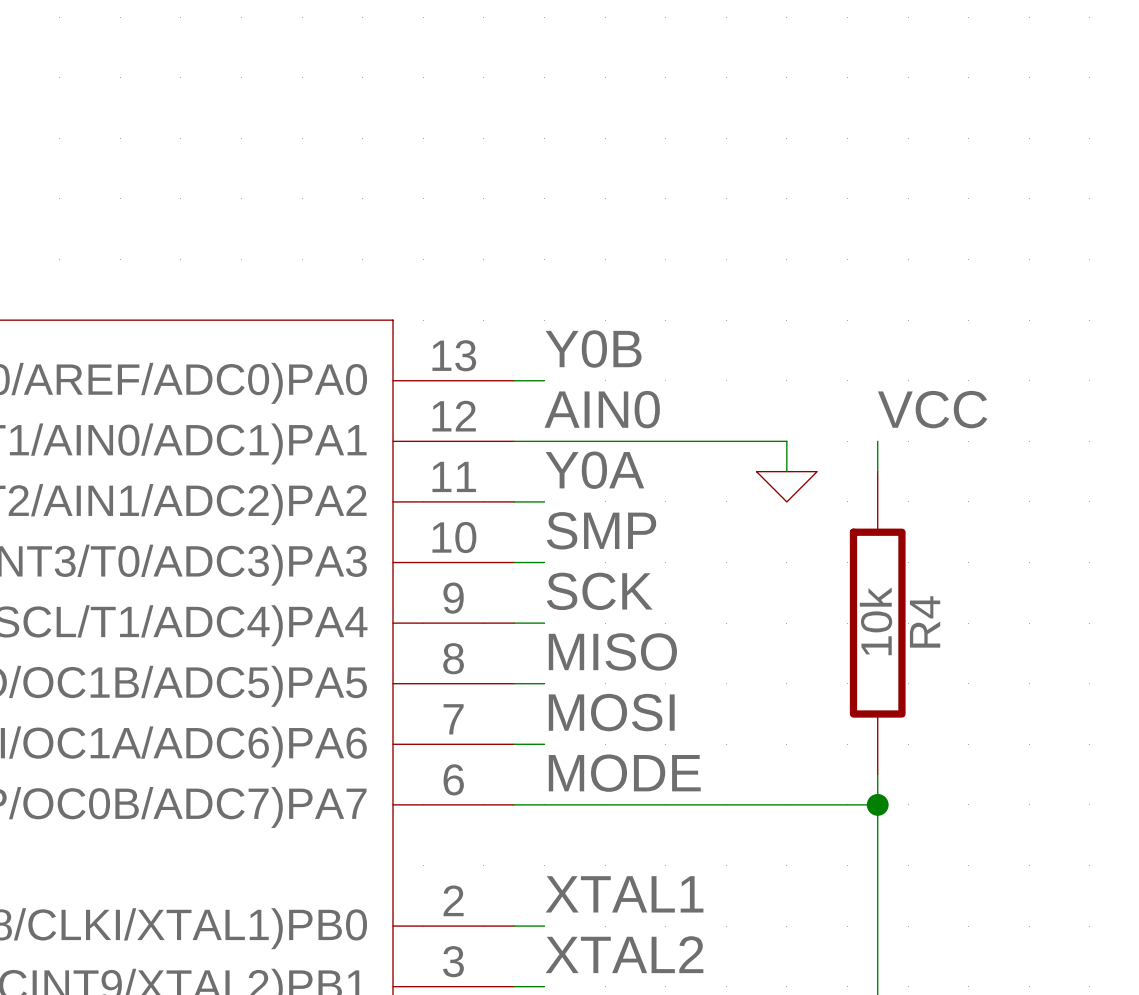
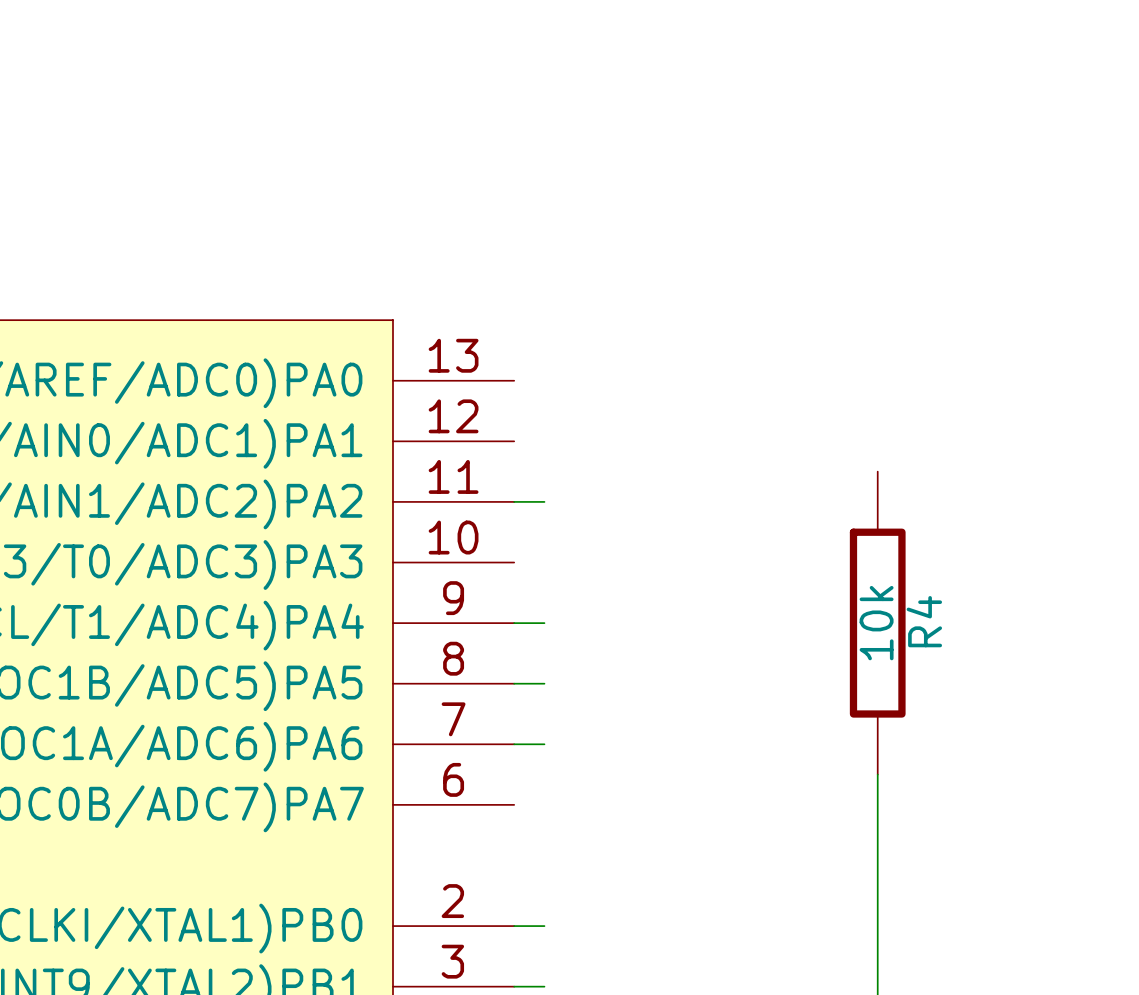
label: Y0B (593, 349) -> none
wire: (514, 380) (544, 380) -> none
label: AIN0 (602, 409) -> none
label: VCC (932, 409) -> none
wire: (514, 441) (786, 441) (786, 471) -> none
wire: (877, 441) (877, 471) -> none
label: Y0A (594, 470) -> none
power symbol: (786, 486) -> none
label: SMP (601, 530) -> none
wire: (514, 562) (544, 562) -> none
label: SCK (599, 591) -> none
label: MISO (612, 651) -> none
label: MOSI (611, 712) -> none
label: MODE (624, 773) -> none
wire: (514, 804) (877, 804) -> none
junction: (877, 804) -> none
label: XTAL1 (624, 894) -> none
label: XTAL2 (624, 954) -> none

